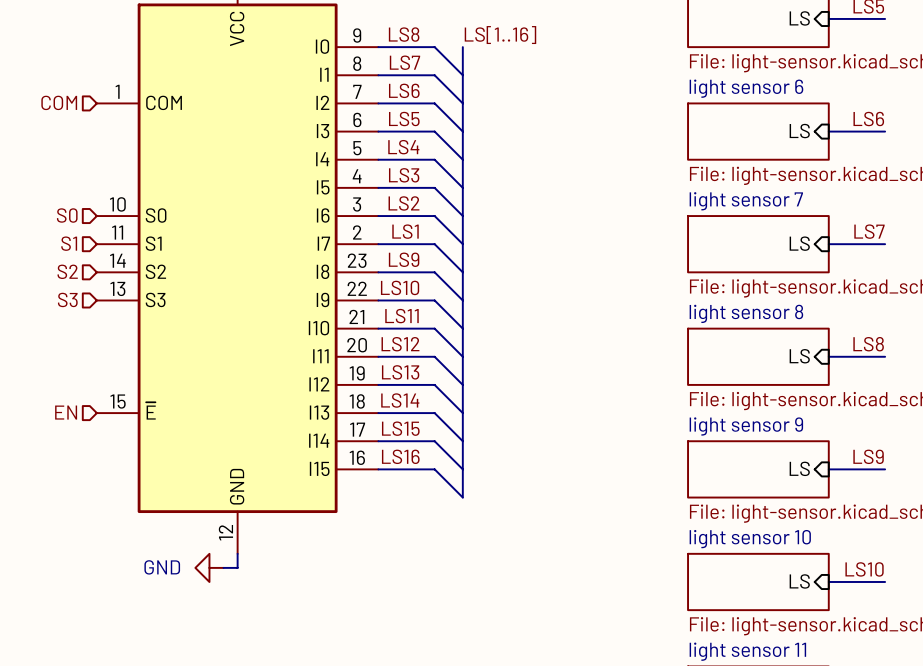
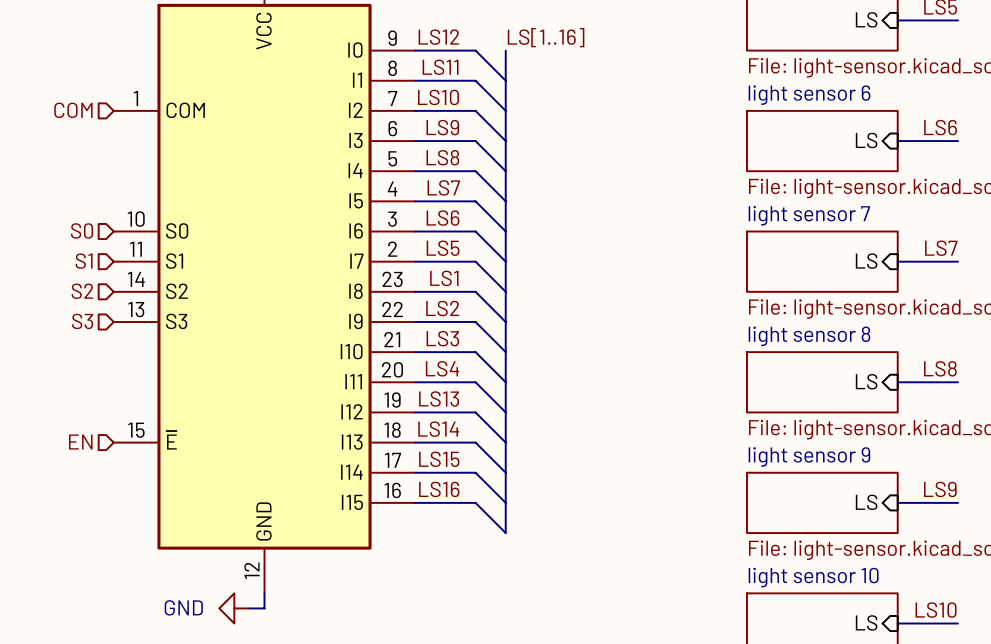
label: LS8 (404, 34) -> LS12 (438, 37)
label: LS7 (404, 62) -> LS11 (440, 67)
label: LS6 (404, 90) -> LS10 (438, 97)
label: LS5 (404, 119) -> LS9 (442, 127)
label: LS4 (403, 147) -> LS8 (442, 157)
label: LS3 (404, 175) -> LS7 (443, 187)
label: LS2 (403, 203) -> LS6 (443, 218)
label: LS1 (405, 231) -> LS5 (443, 248)
label: LS9 (404, 259) -> LS1 (444, 278)
label: LS10 (400, 287) -> LS2 (442, 308)
label: LS11 (401, 316) -> LS3 (442, 338)
label: LS12 (400, 344) -> LS4 (442, 368)

